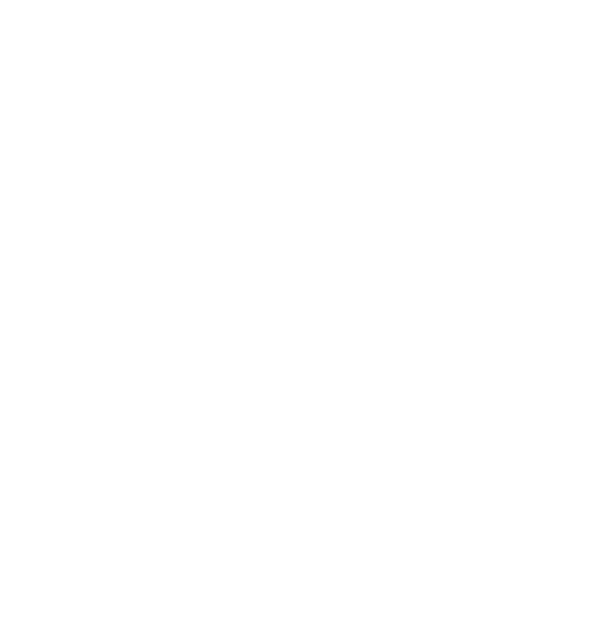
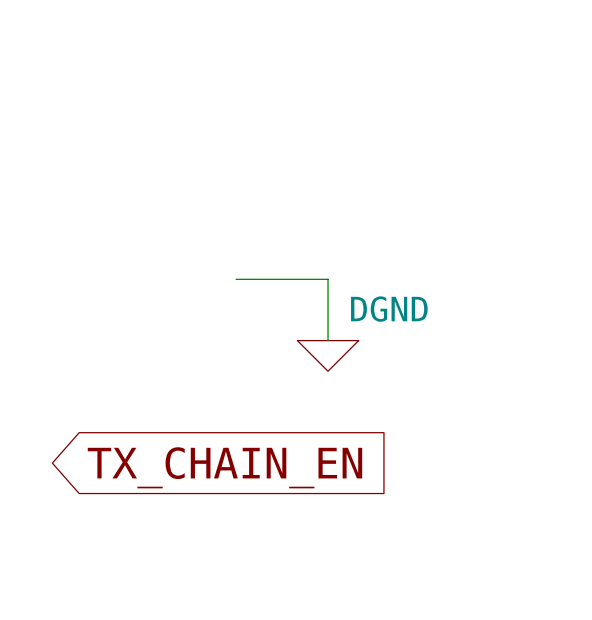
wire: none -> (236, 279) (328, 279) (328, 340)
power symbol: none -> DGND (328, 355)
global label: none -> TX_CHAIN_EN (224, 467)

